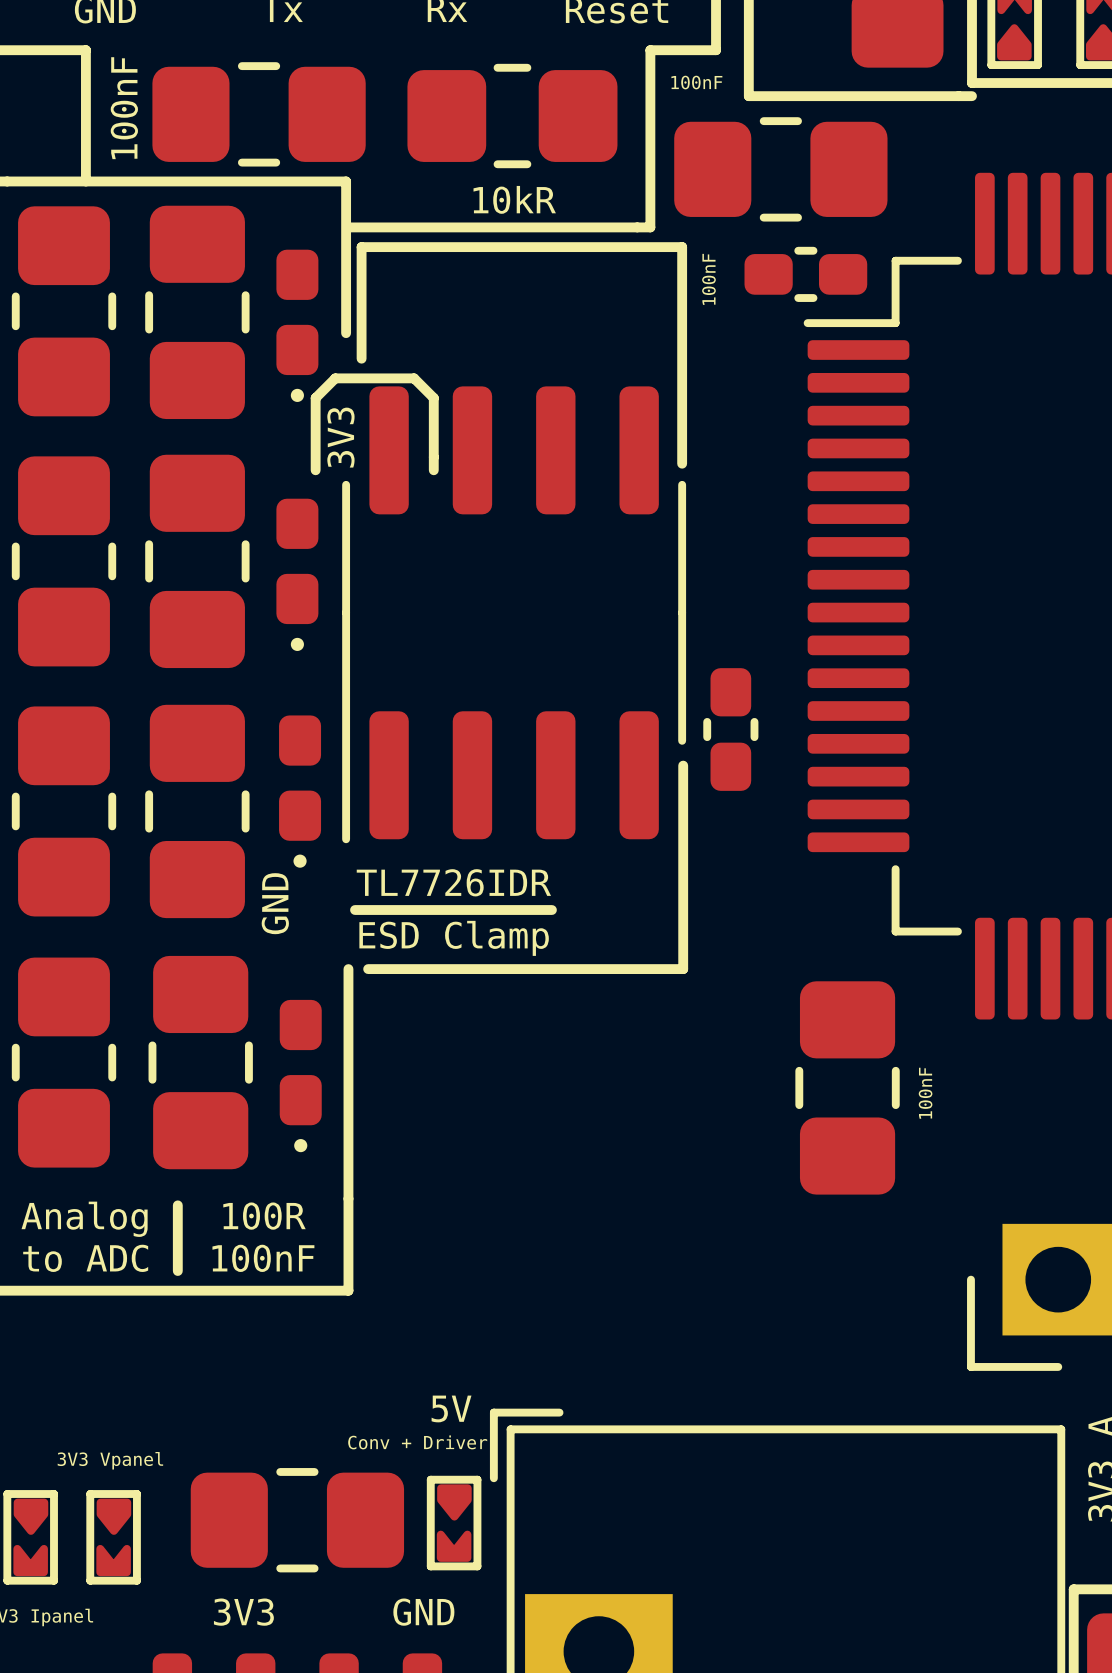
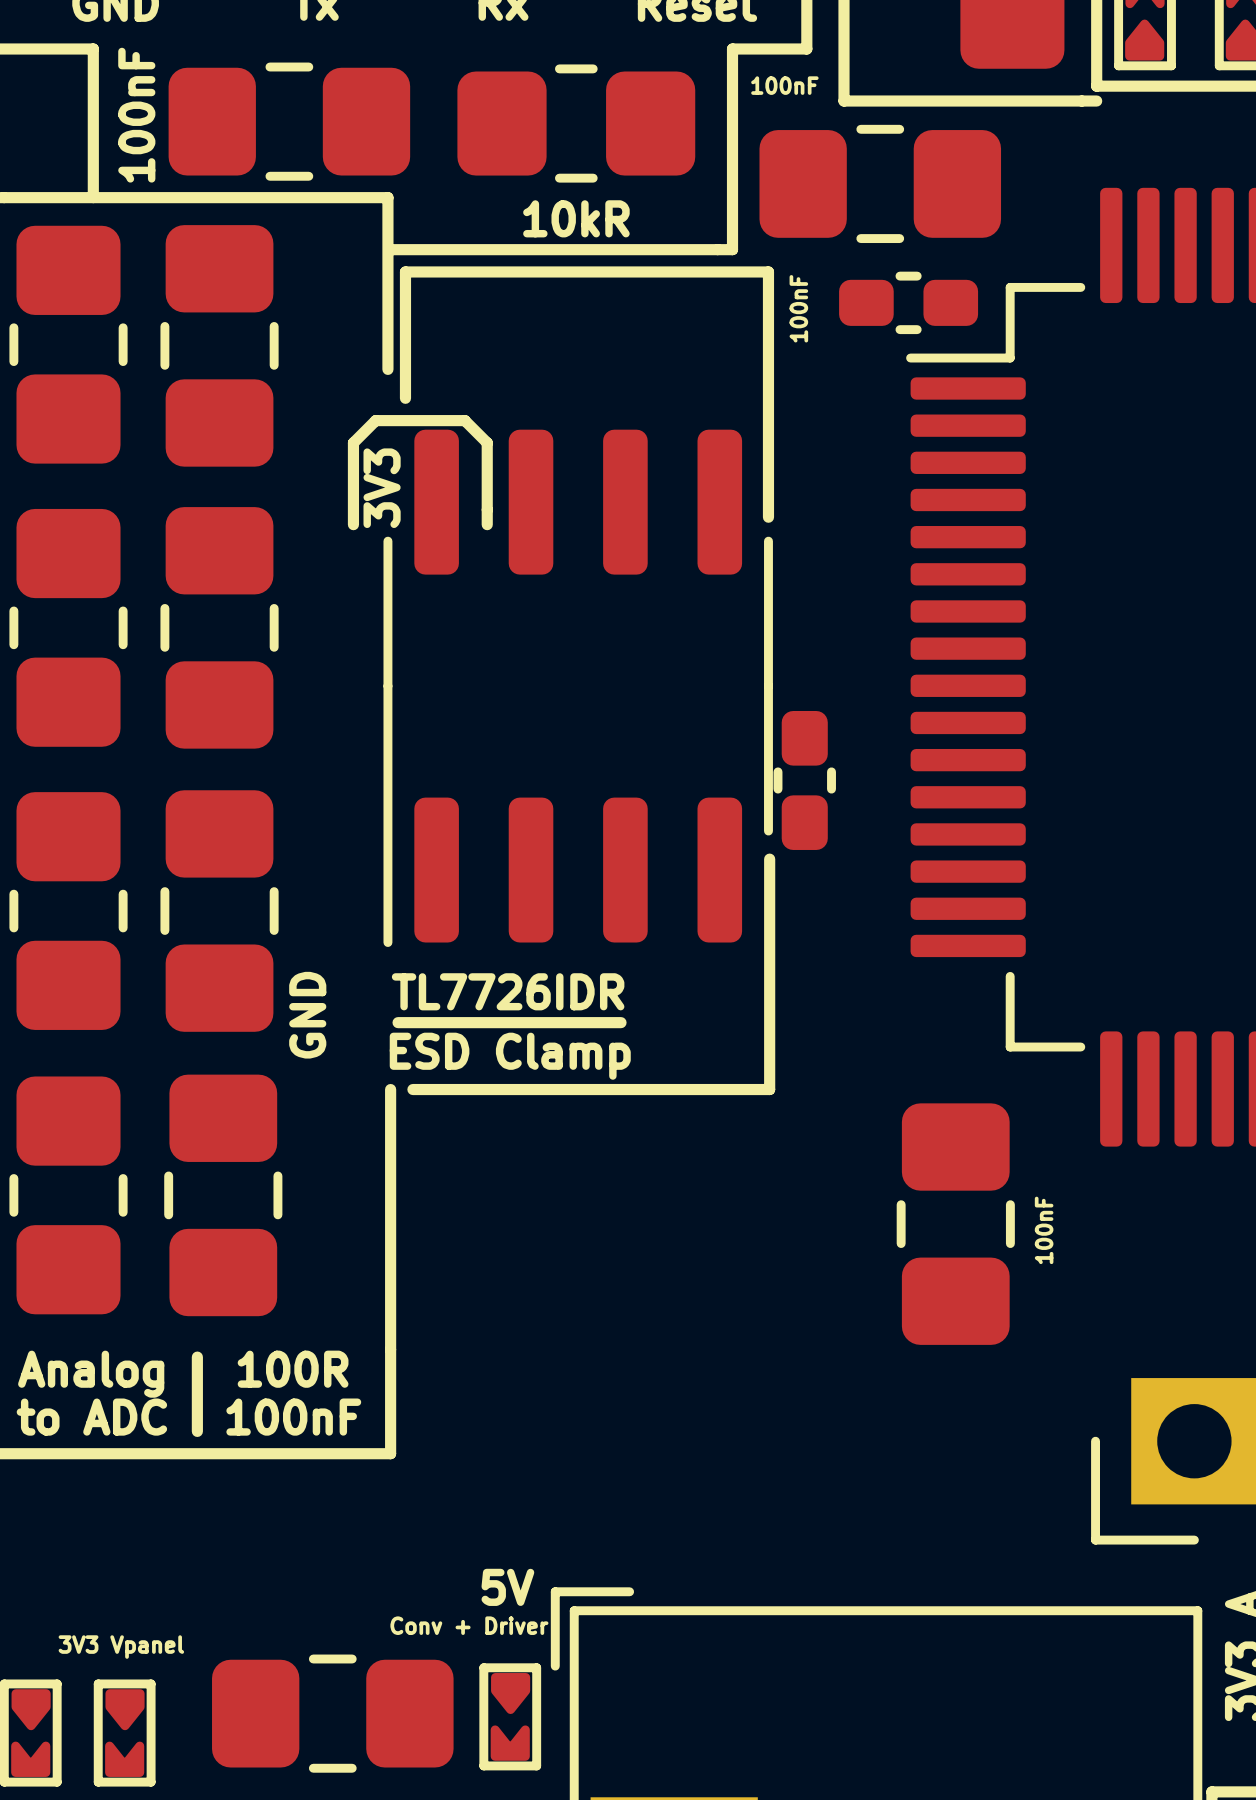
part: (297, 325) -> none
part: (297, 574) -> none
part position: (730, 729) -> (804, 780)
part: (300, 791) -> none
part: (300, 1076) -> none

